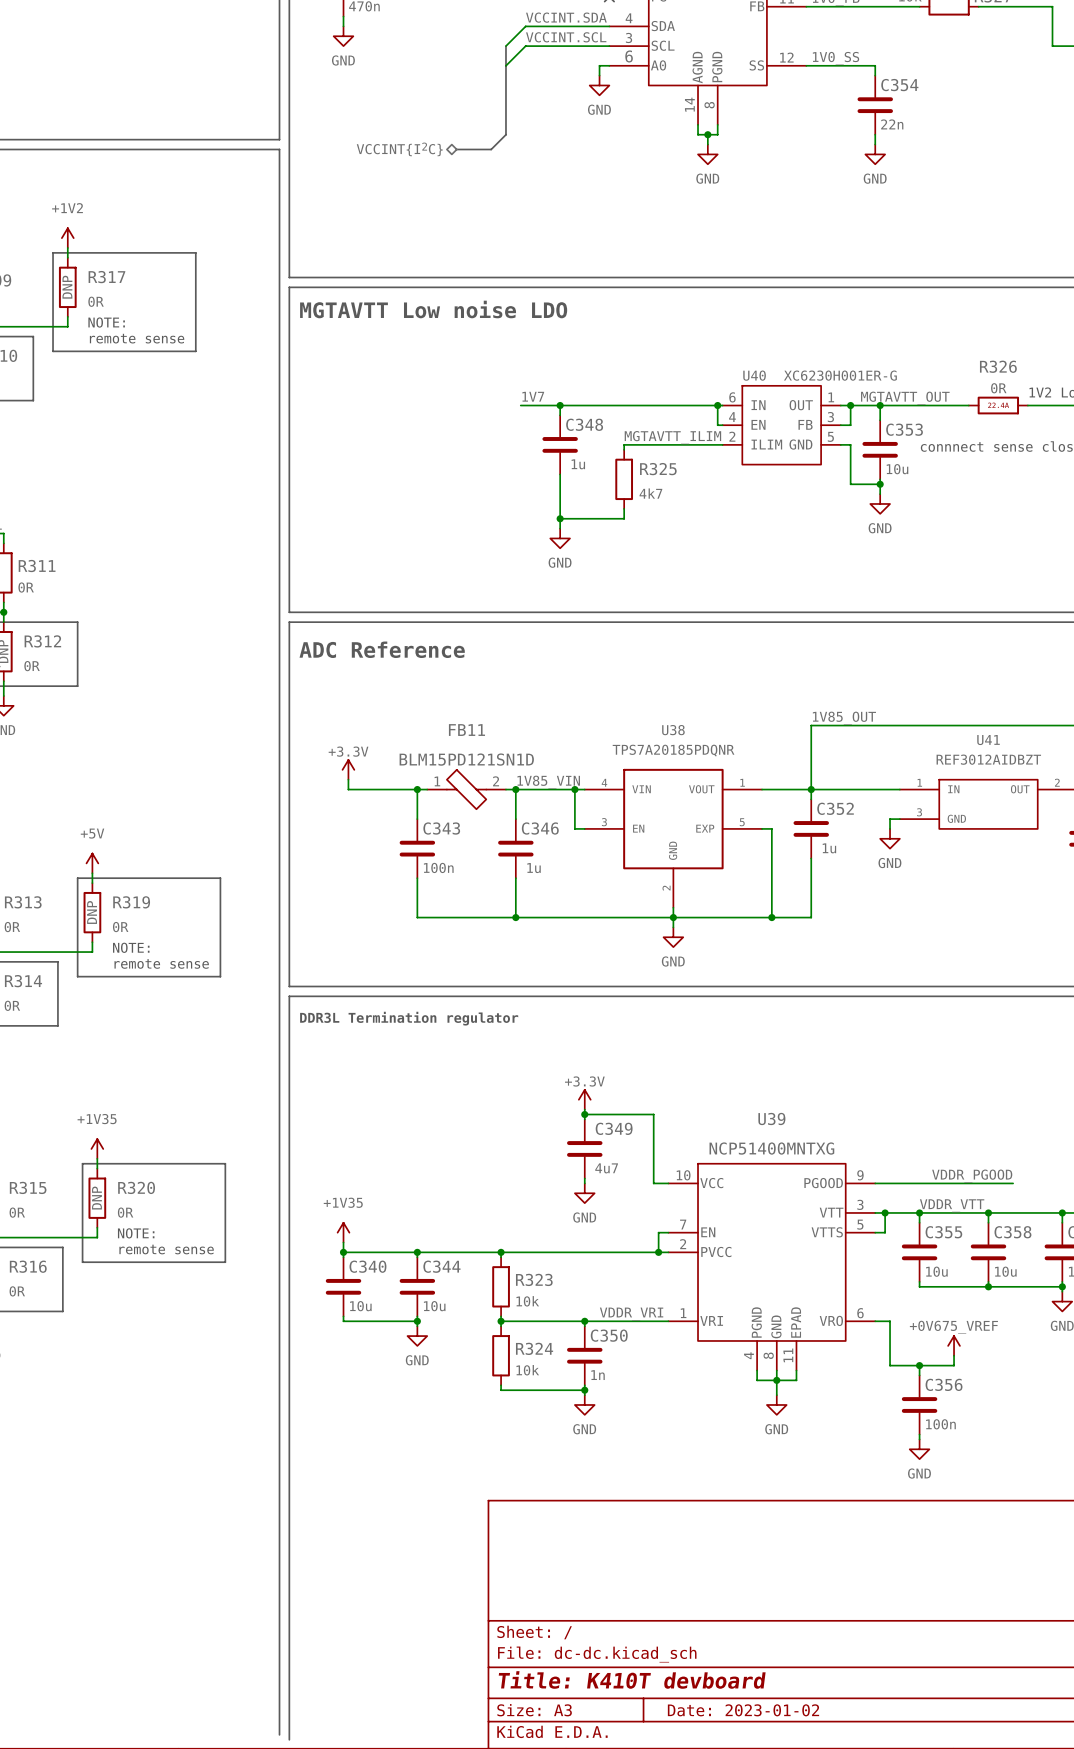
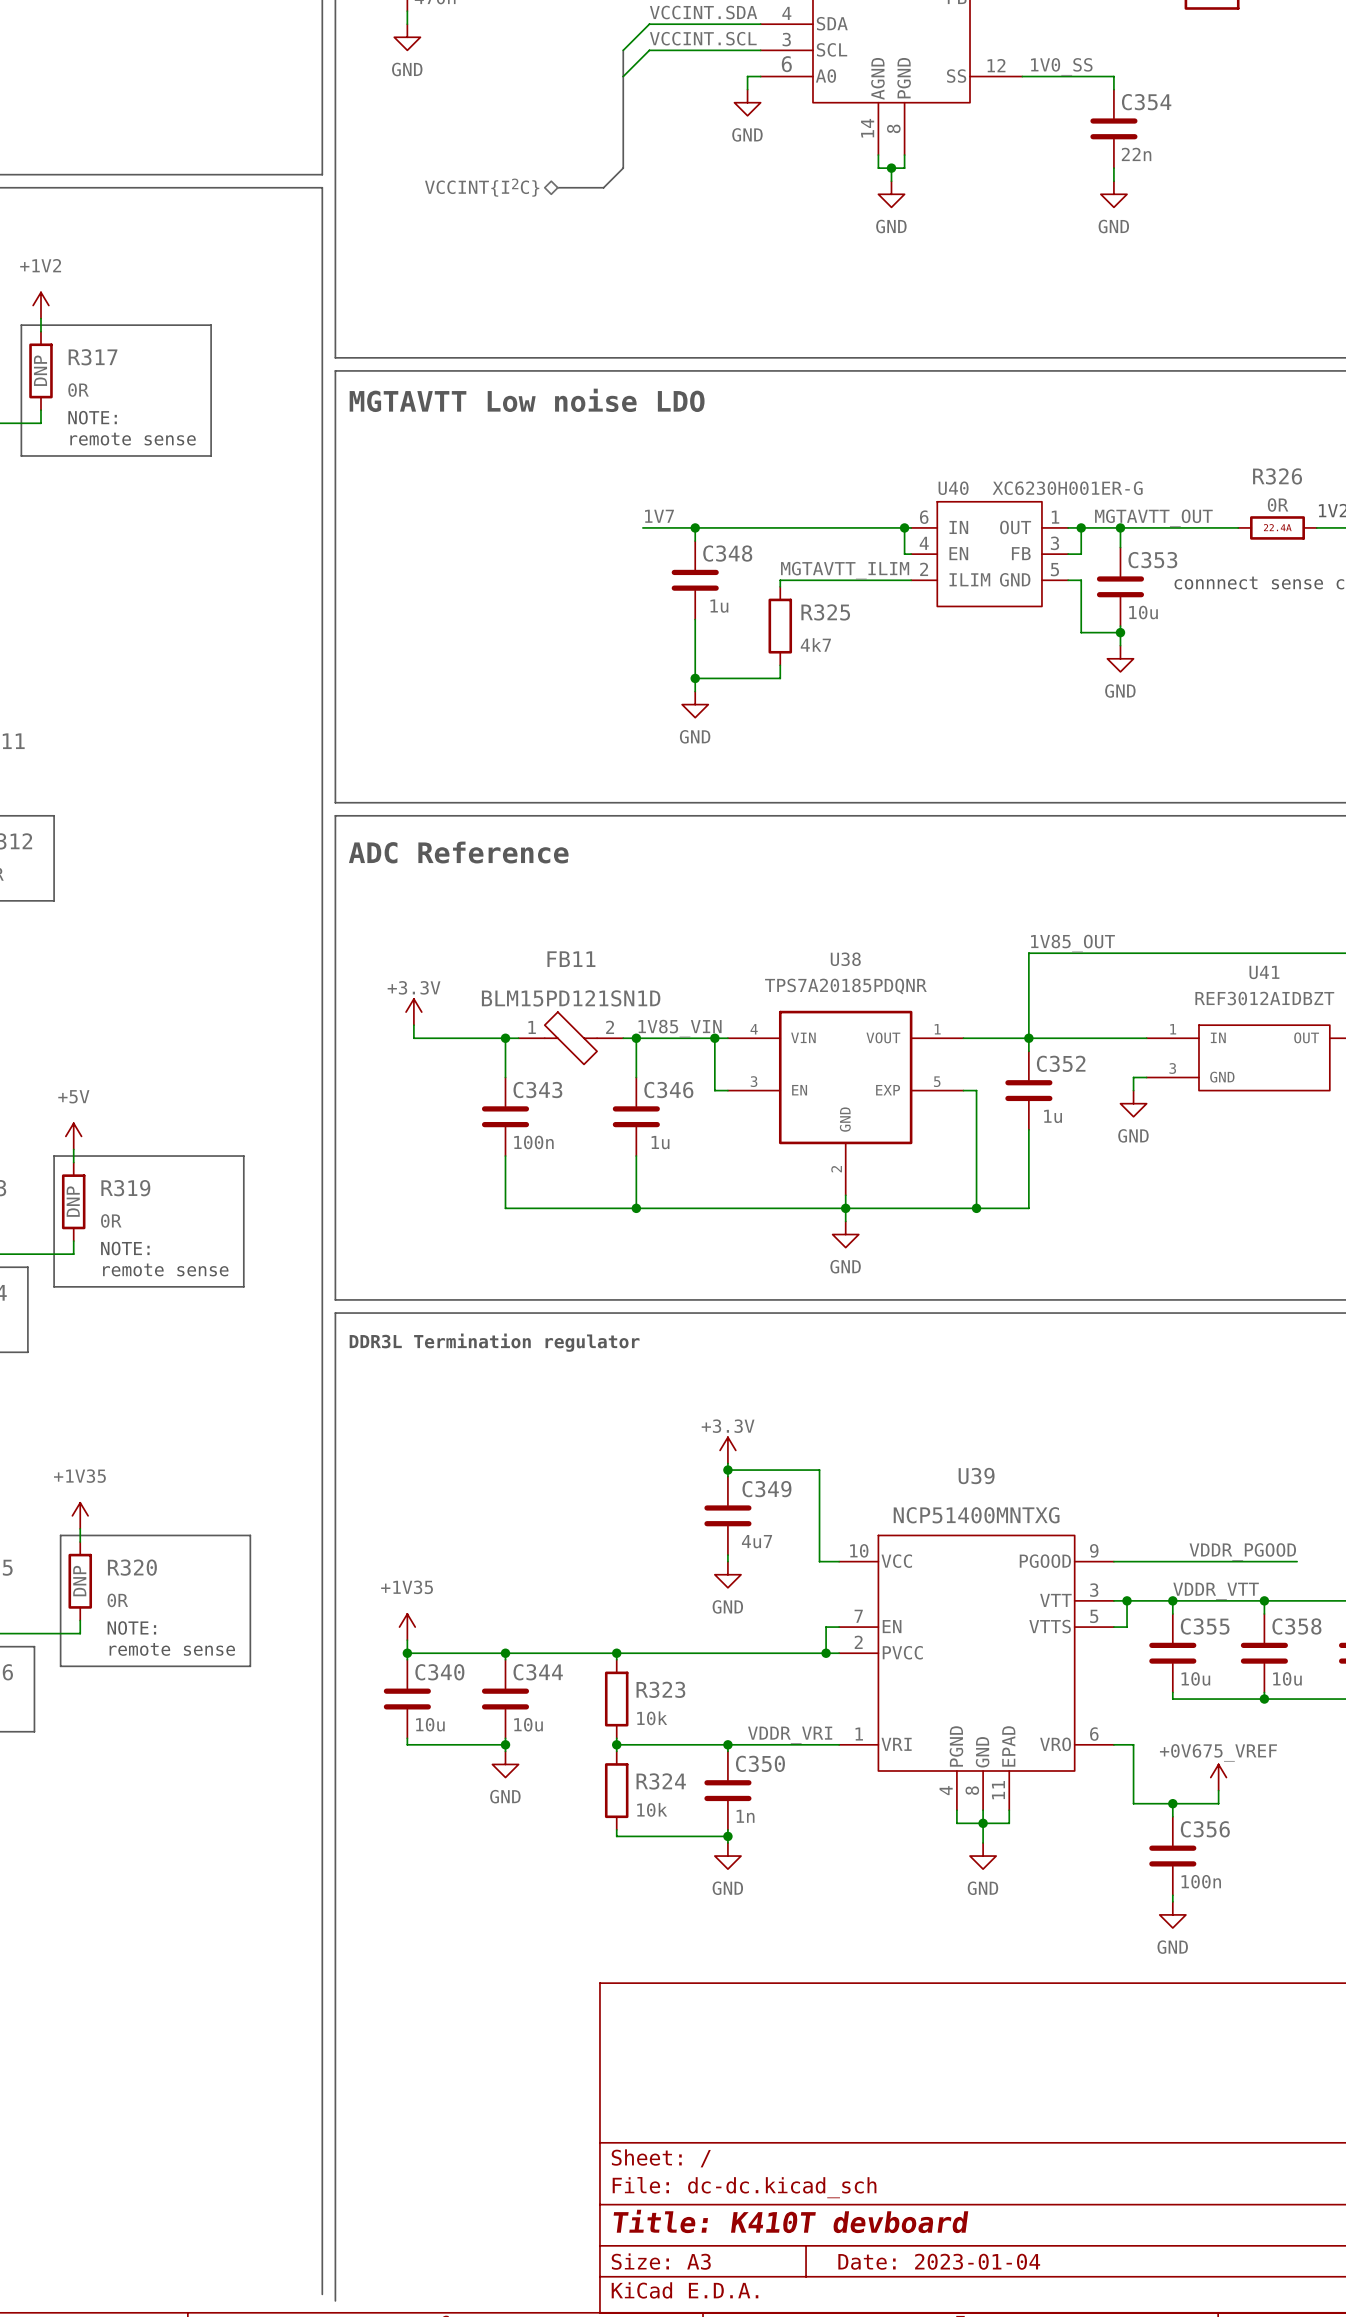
title block: Date: 2023-01-02 (743, 1710) -> Date: 2023-01-04 (939, 2261)

